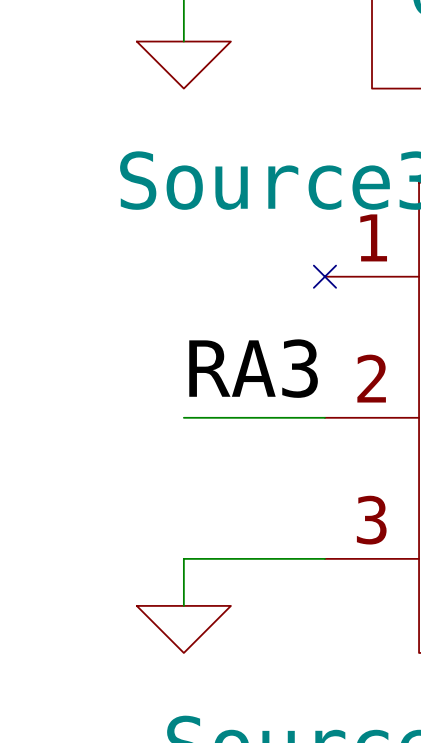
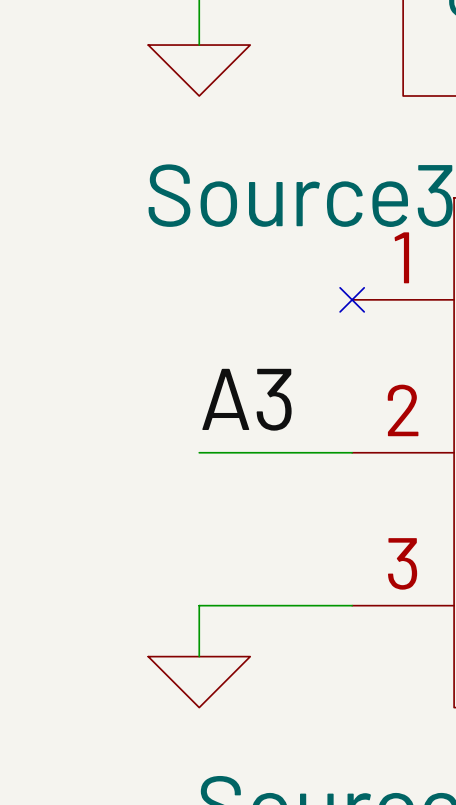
label: RA3 (253, 368) -> A3 (246, 399)

